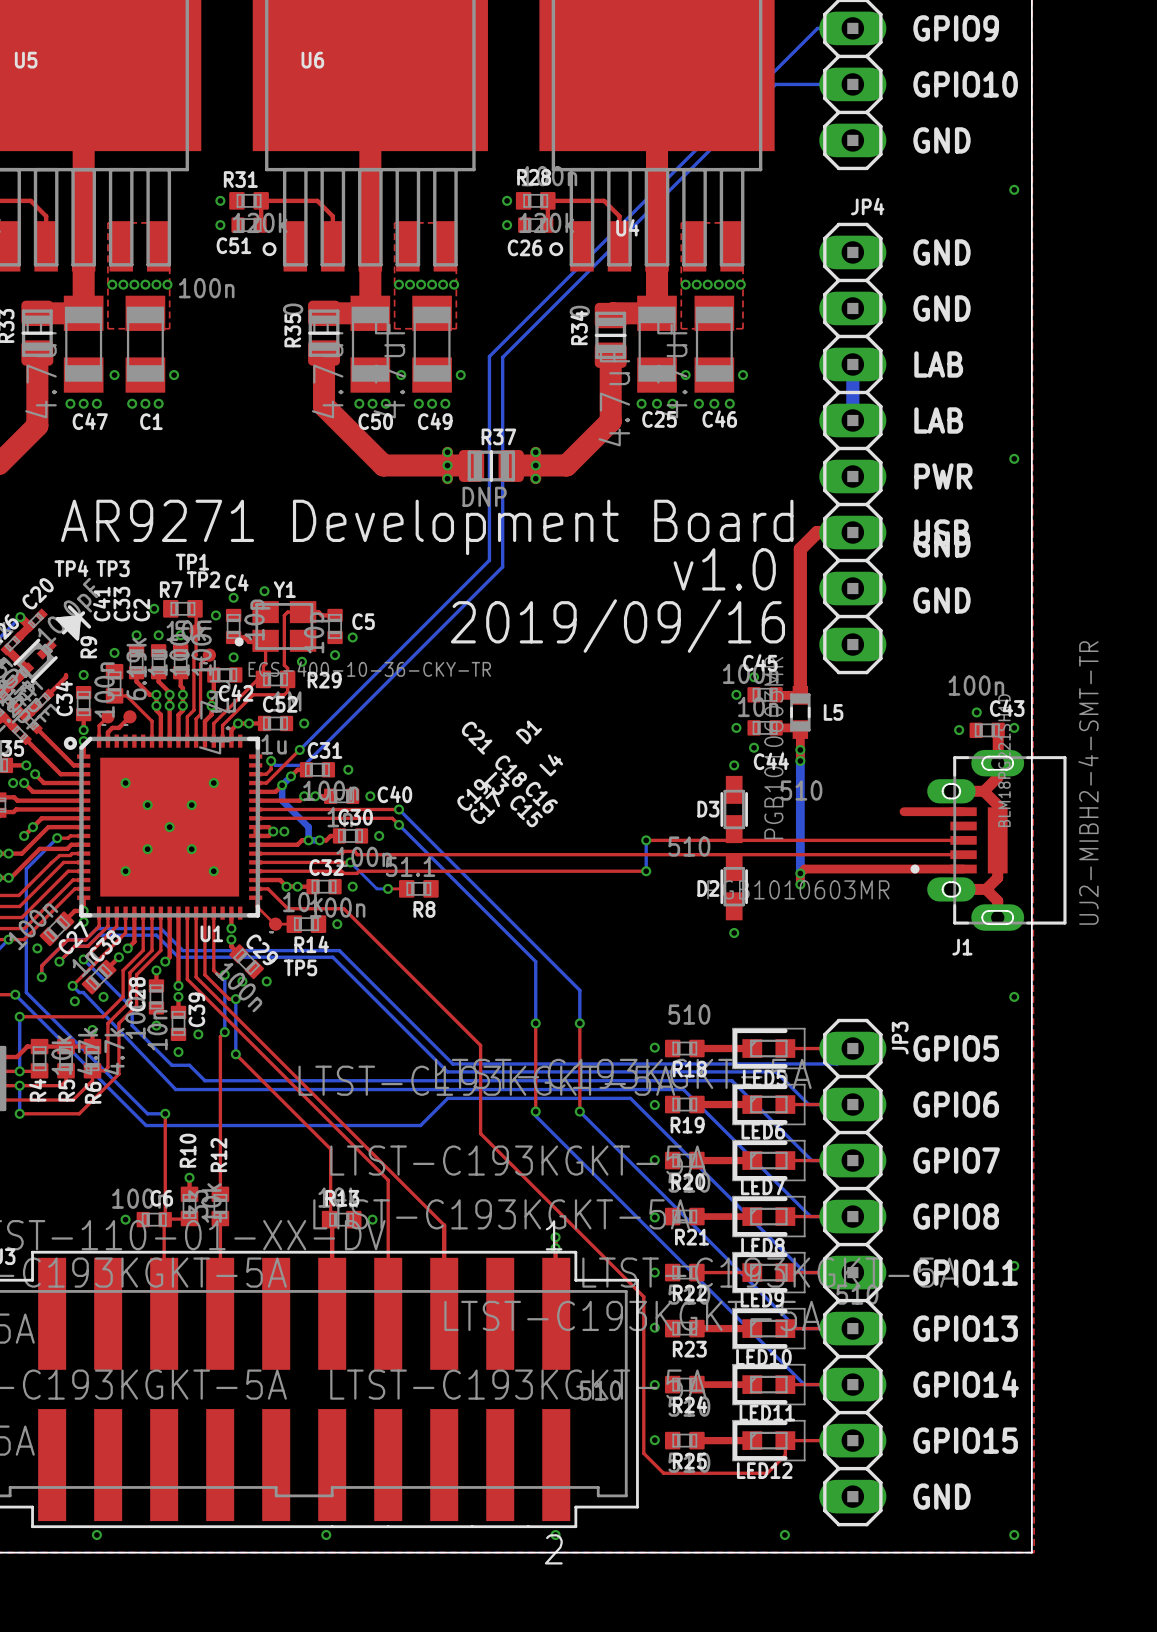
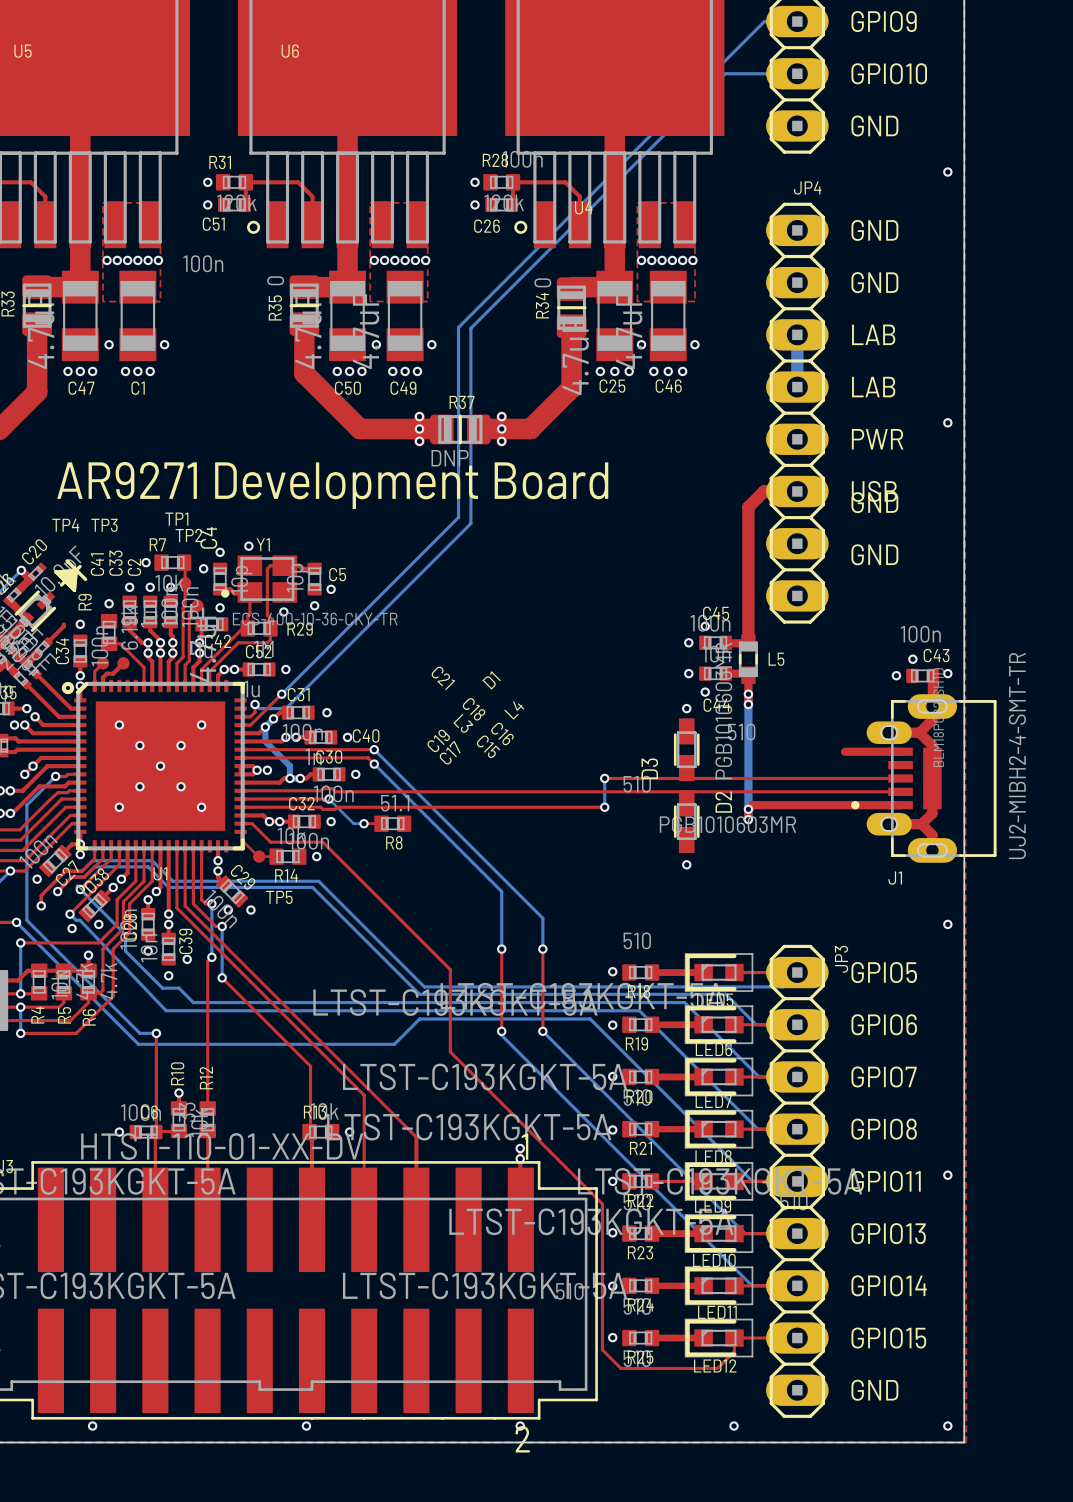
text: v1.0 (724, 569) -> none
C4 name rotation: 0° (237, 582) -> 90° counterclockwise (208, 537)
text: 2019/09/16 (617, 626) -> none
D3 name rotation: 0° (708, 809) -> 90° counterclockwise (649, 768)
D2 name rotation: 0° (708, 888) -> 90° counterclockwise (723, 802)
D2 name position: D2 (708, 888) -> D2 (723, 802)
U1 name position: U1 (211, 933) -> U1 (160, 873)

